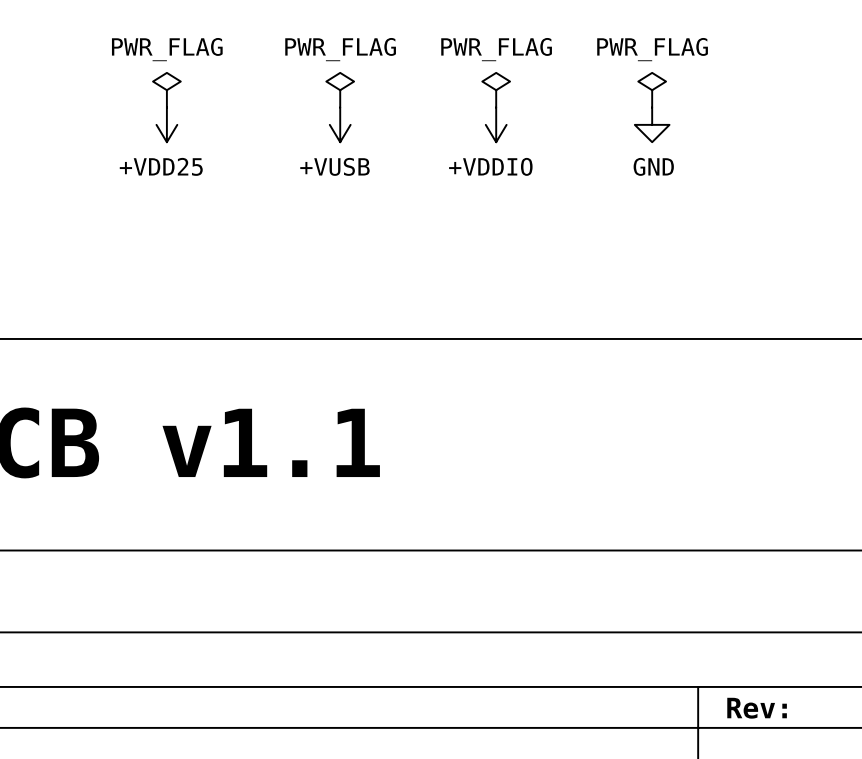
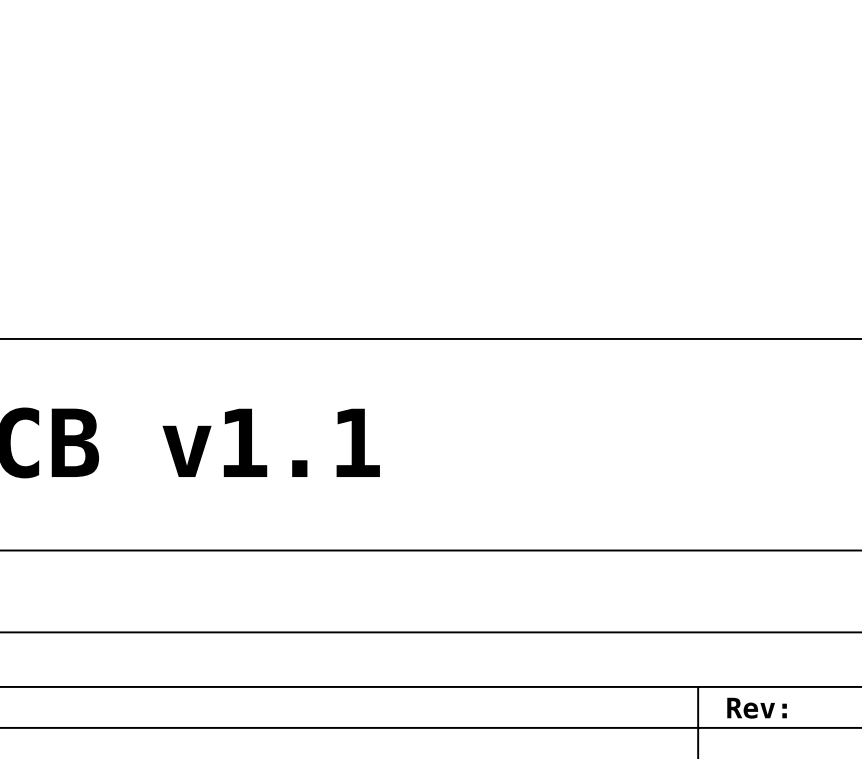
power symbol: PWR_FLAG (166, 90) -> none
power symbol: PWR_FLAG (340, 90) -> none
power symbol: PWR_FLAG (496, 90) -> none
power symbol: PWR_FLAG (652, 90) -> none
power symbol: +VDD25 (166, 124) -> none
power symbol: +VUSB (340, 124) -> none
power symbol: +VDDIO (496, 124) -> none
power symbol: GND (652, 124) -> none

